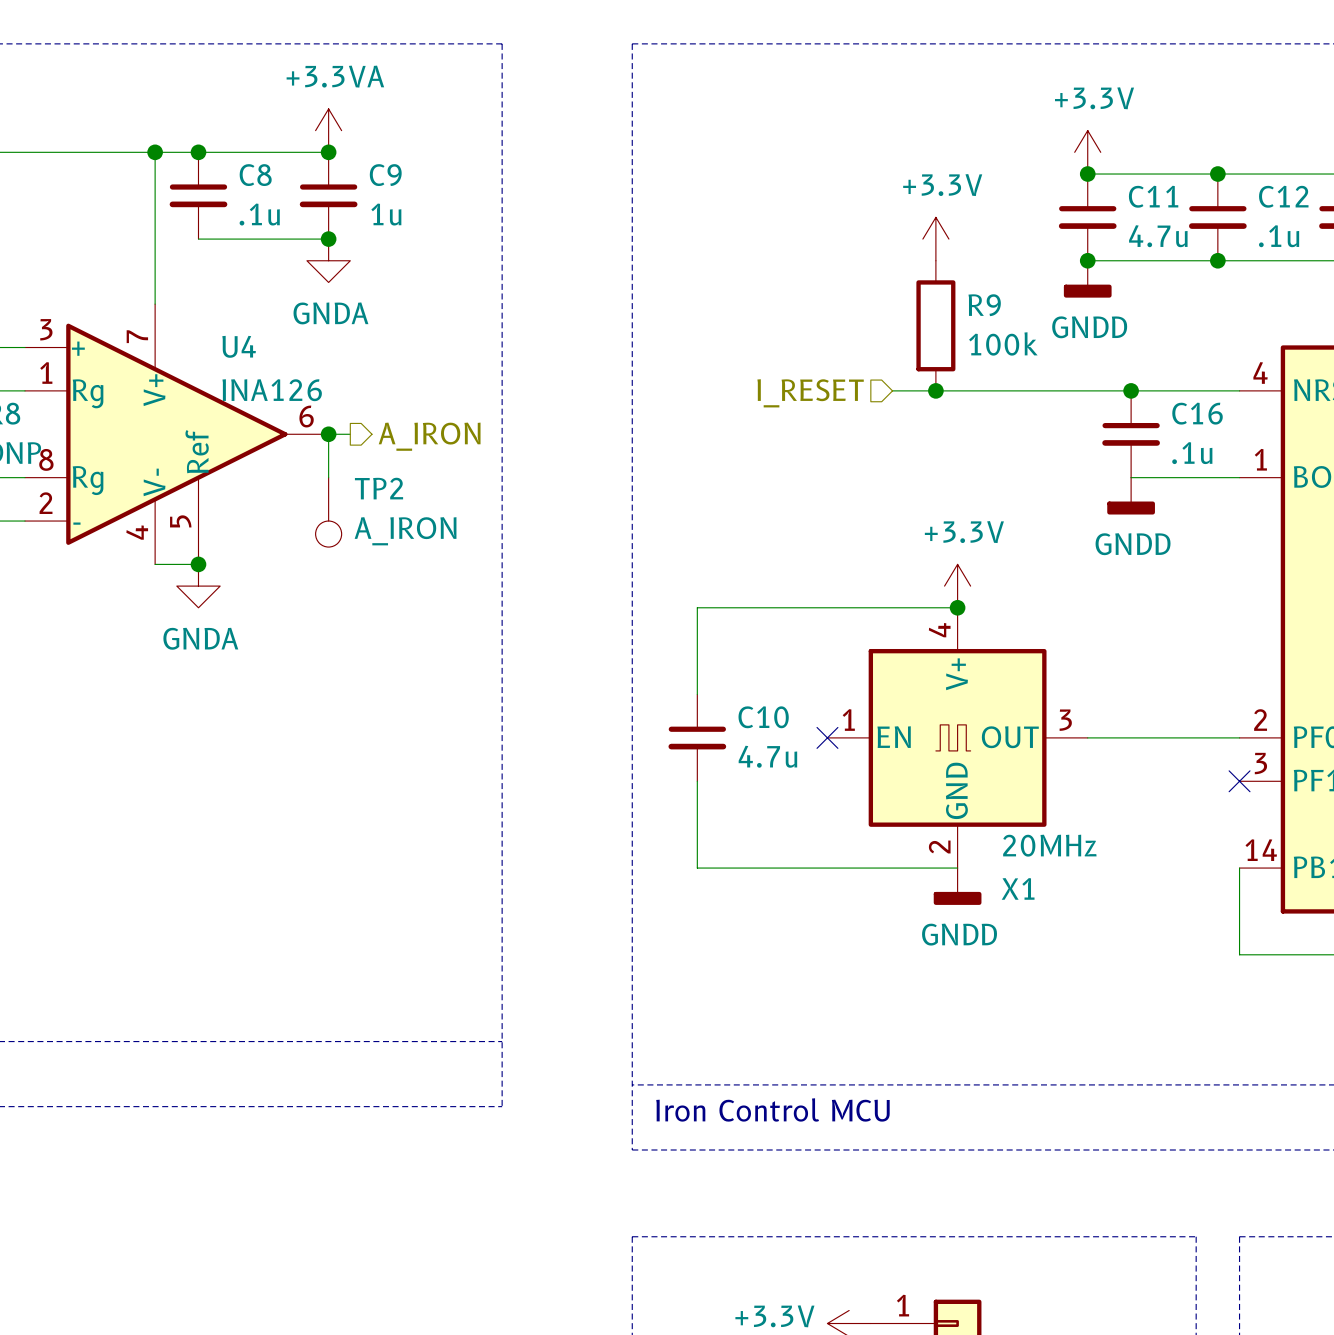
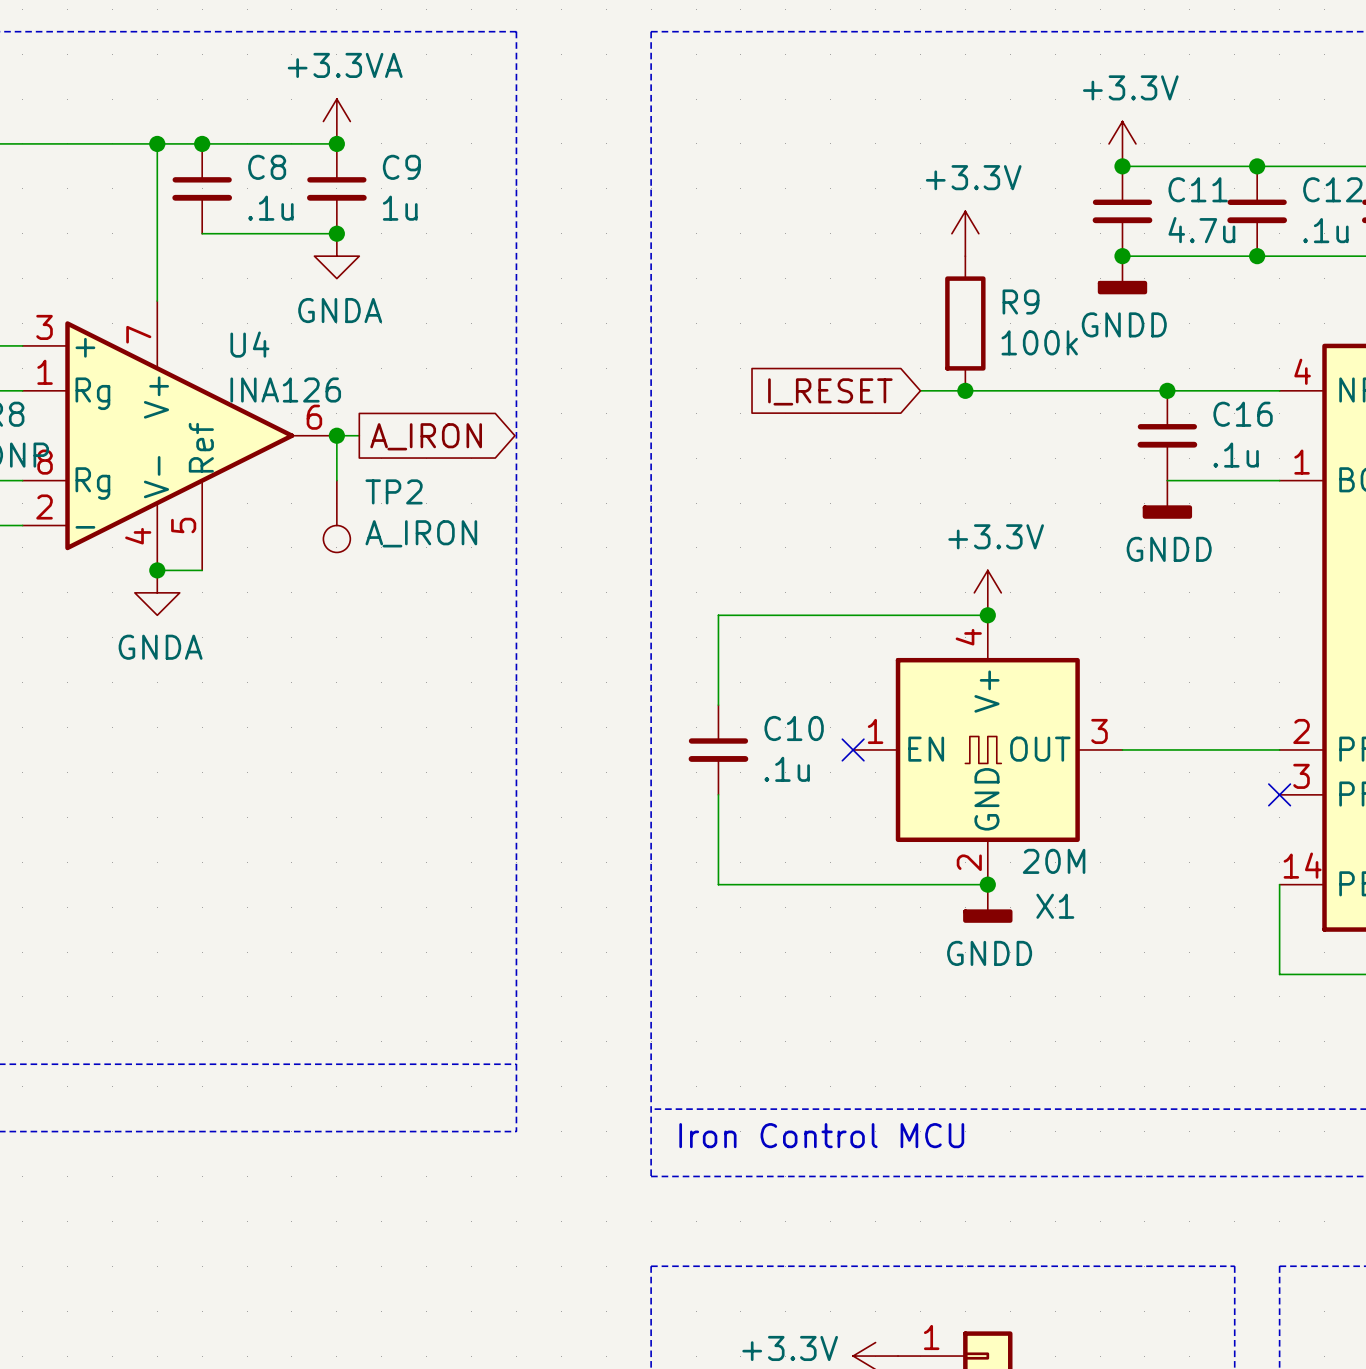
hierarchical label: I_RESET (810, 393) -> none
global label: none -> I_RESET (830, 391)
hierarchical label: A_IRON (429, 436) -> none
global label: none -> A_IRON (426, 436)
junction position: (198, 564) -> (157, 570)
power symbol position: GNDA (198, 586) -> GNDA (157, 592)
C10 value: 4.7u (767, 756) -> .1u (787, 769)
X1 text: none -> 20M (1054, 861)
X1 value: 20MHz (1049, 845) -> none
junction: none -> (987, 884)

